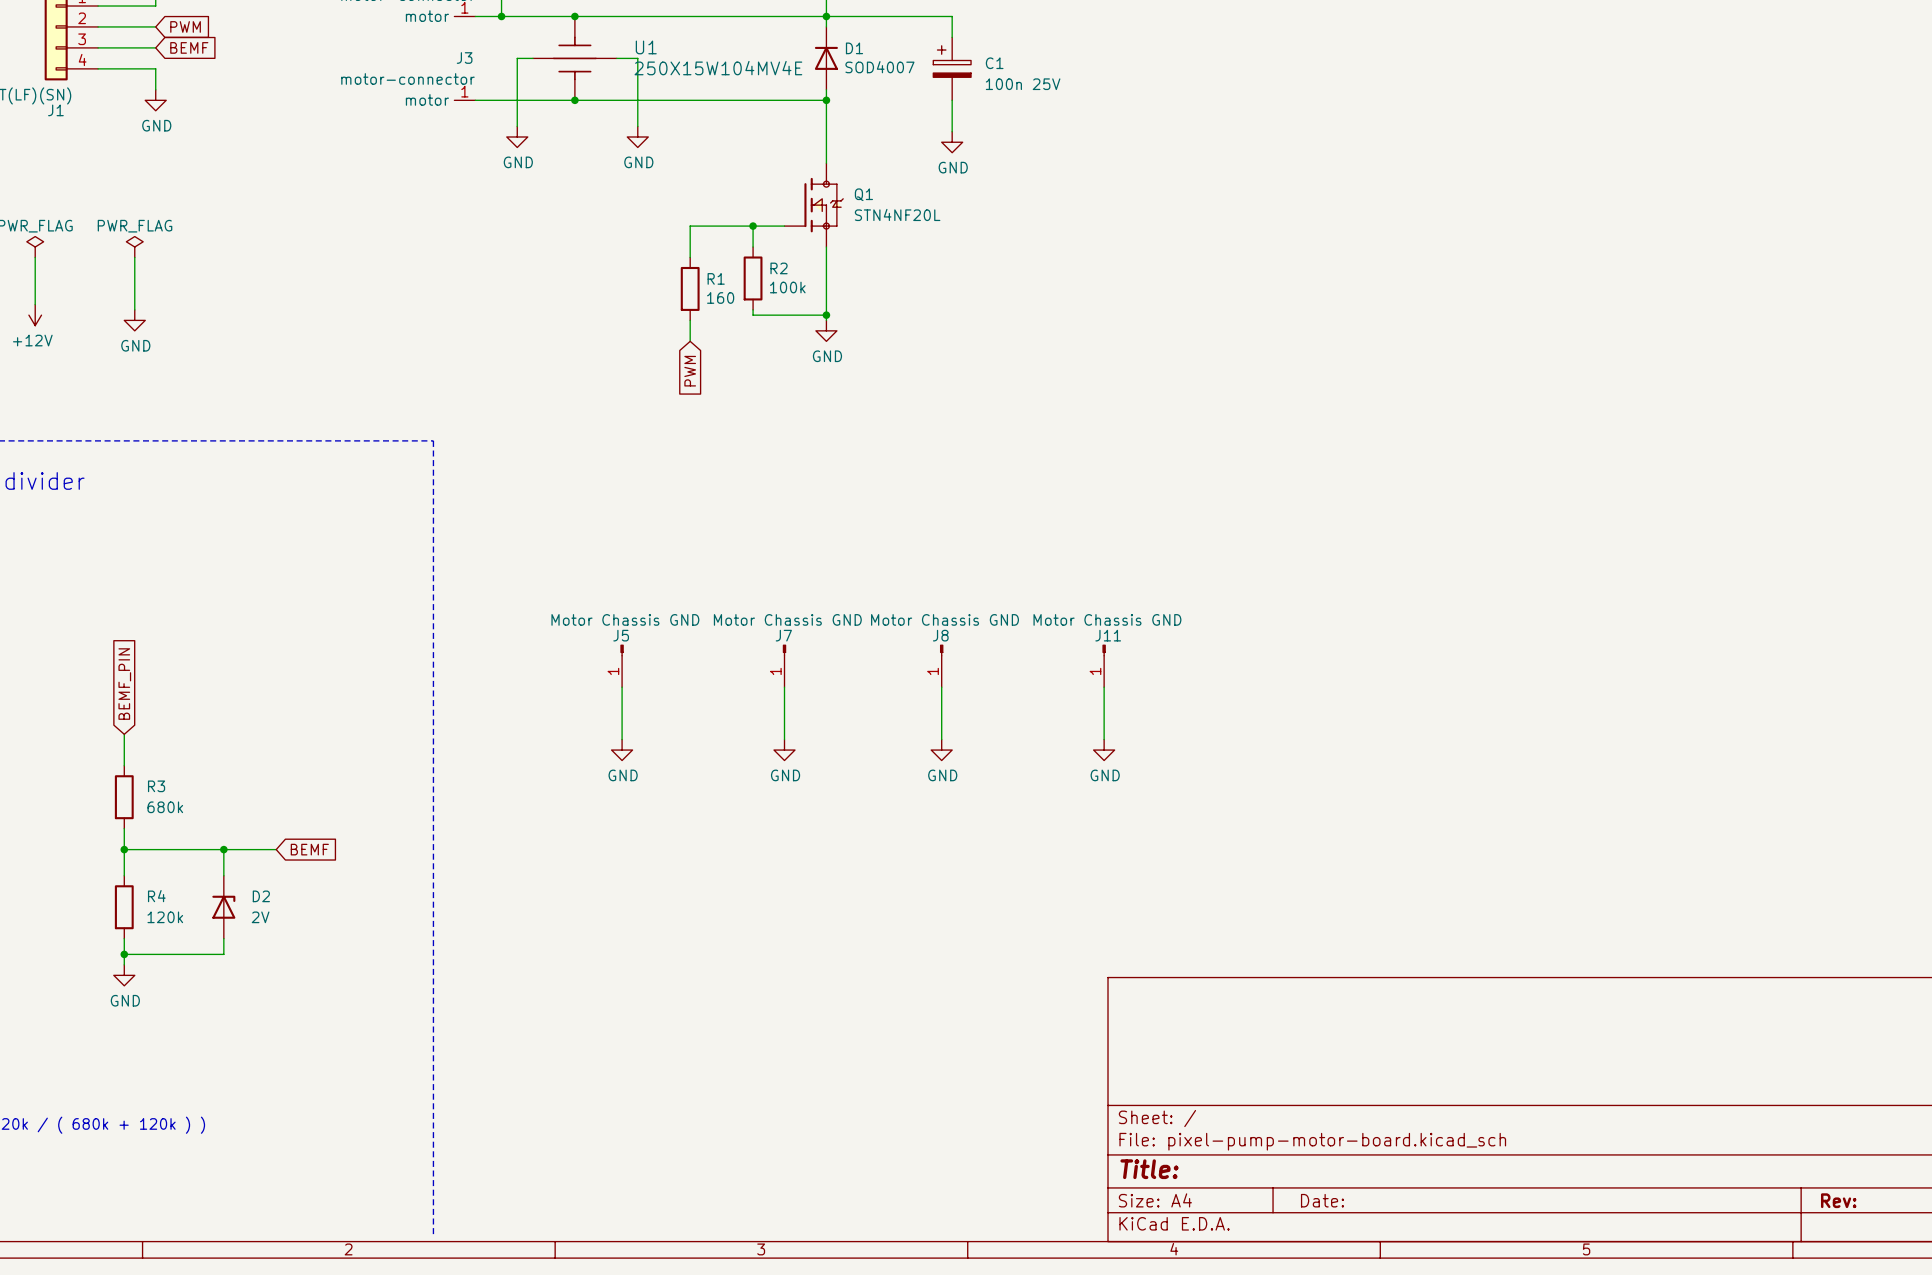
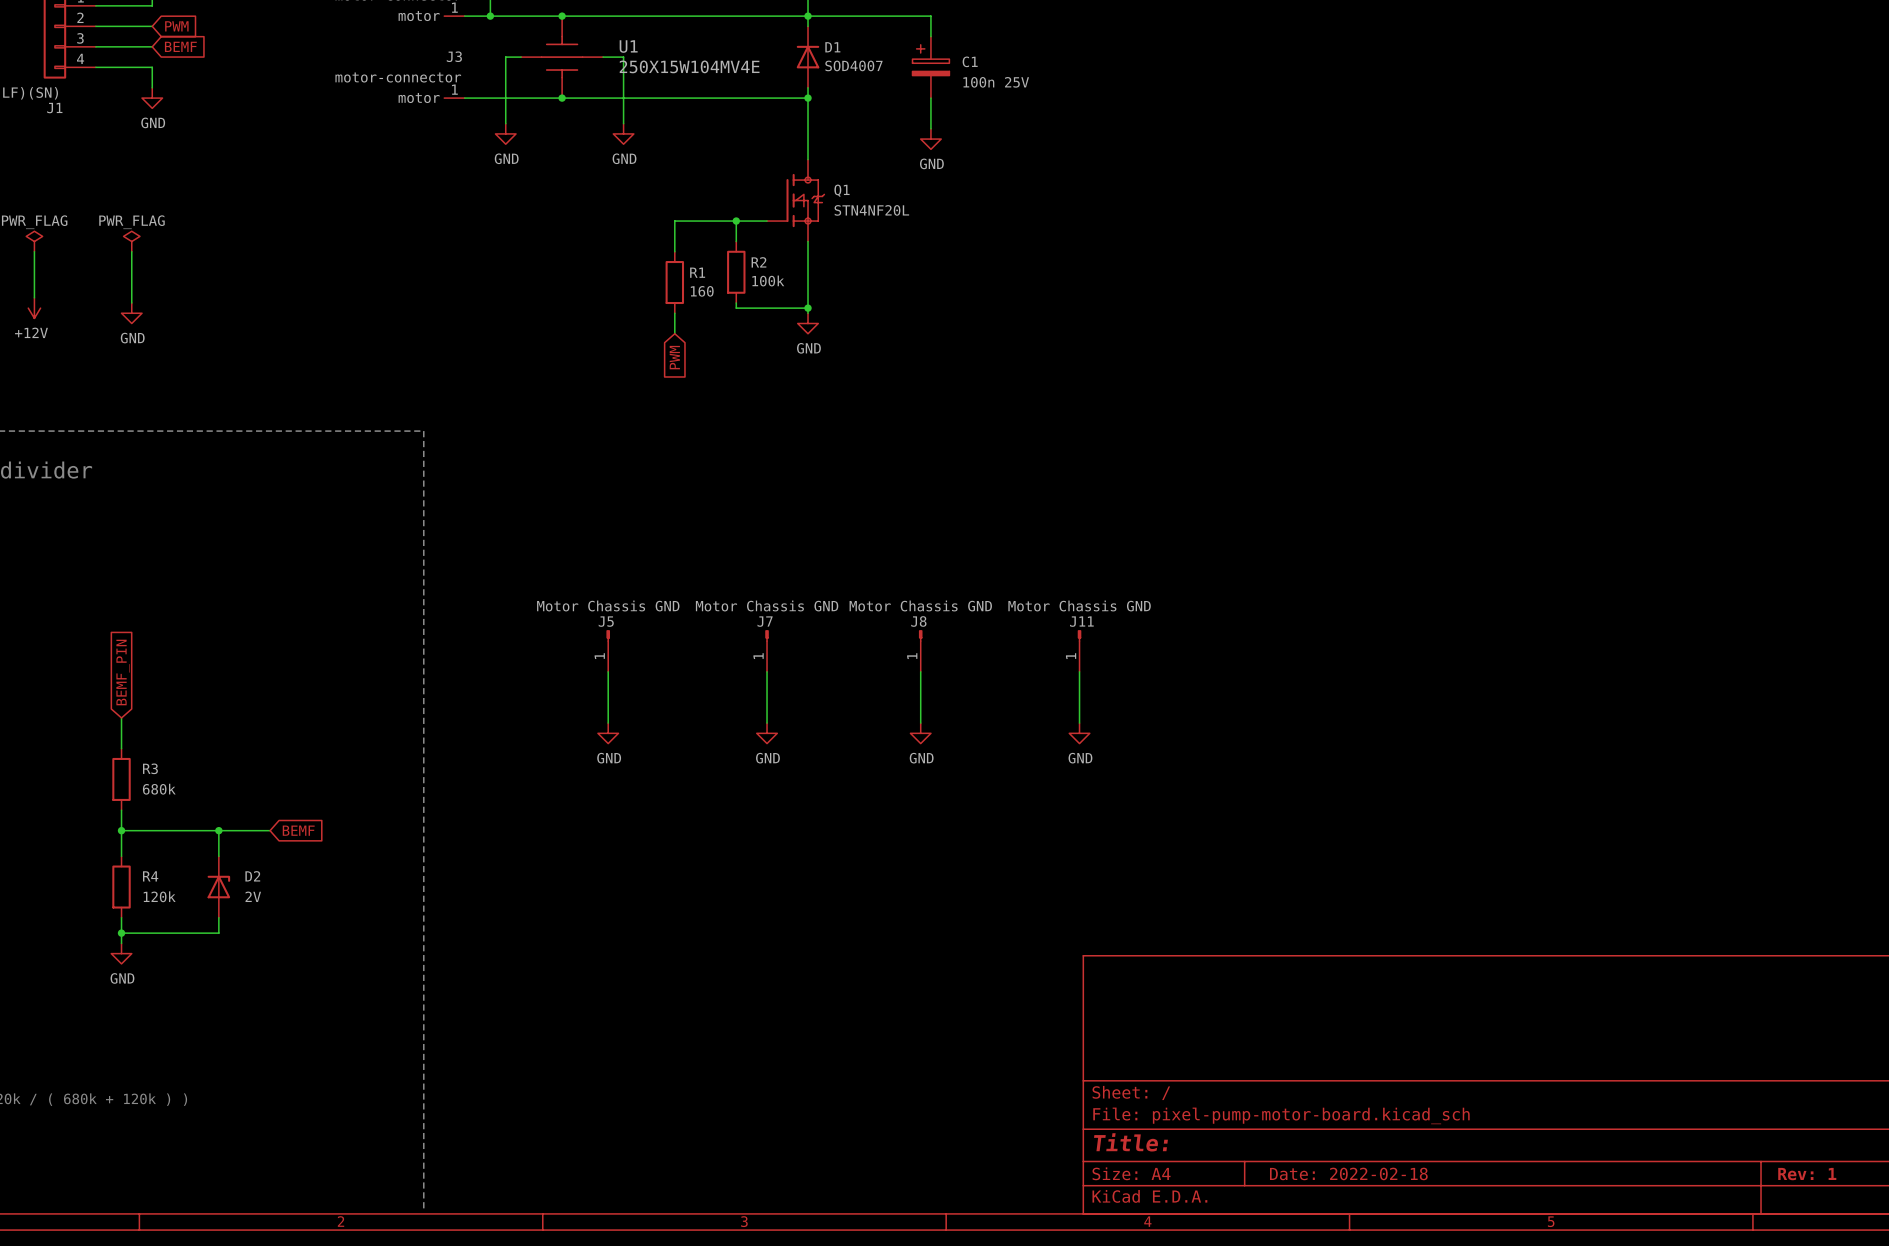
title block: Date: (1322, 1200) -> Date: 2022-02-18 (1348, 1173)
title block: Rev: (1838, 1200) -> Rev: 1 (1807, 1174)

